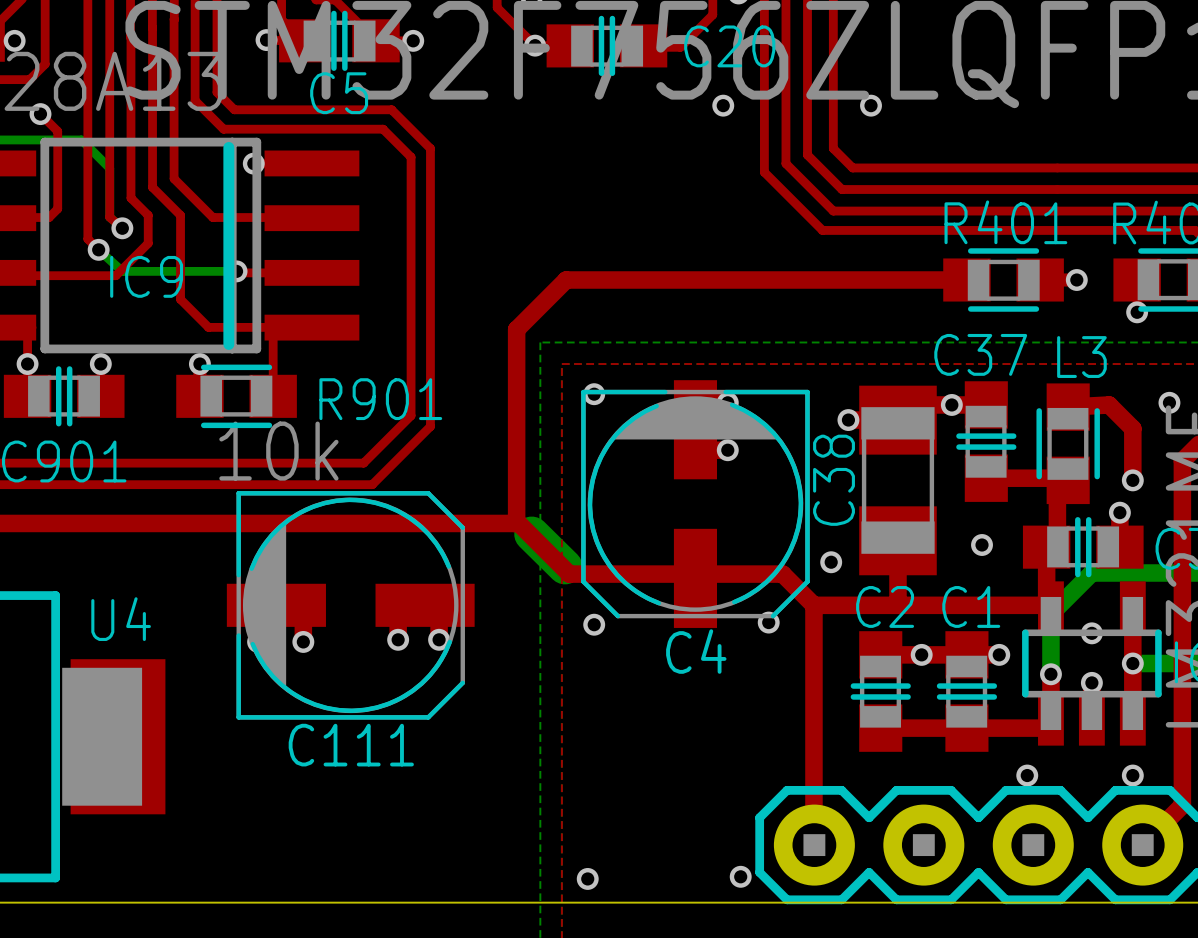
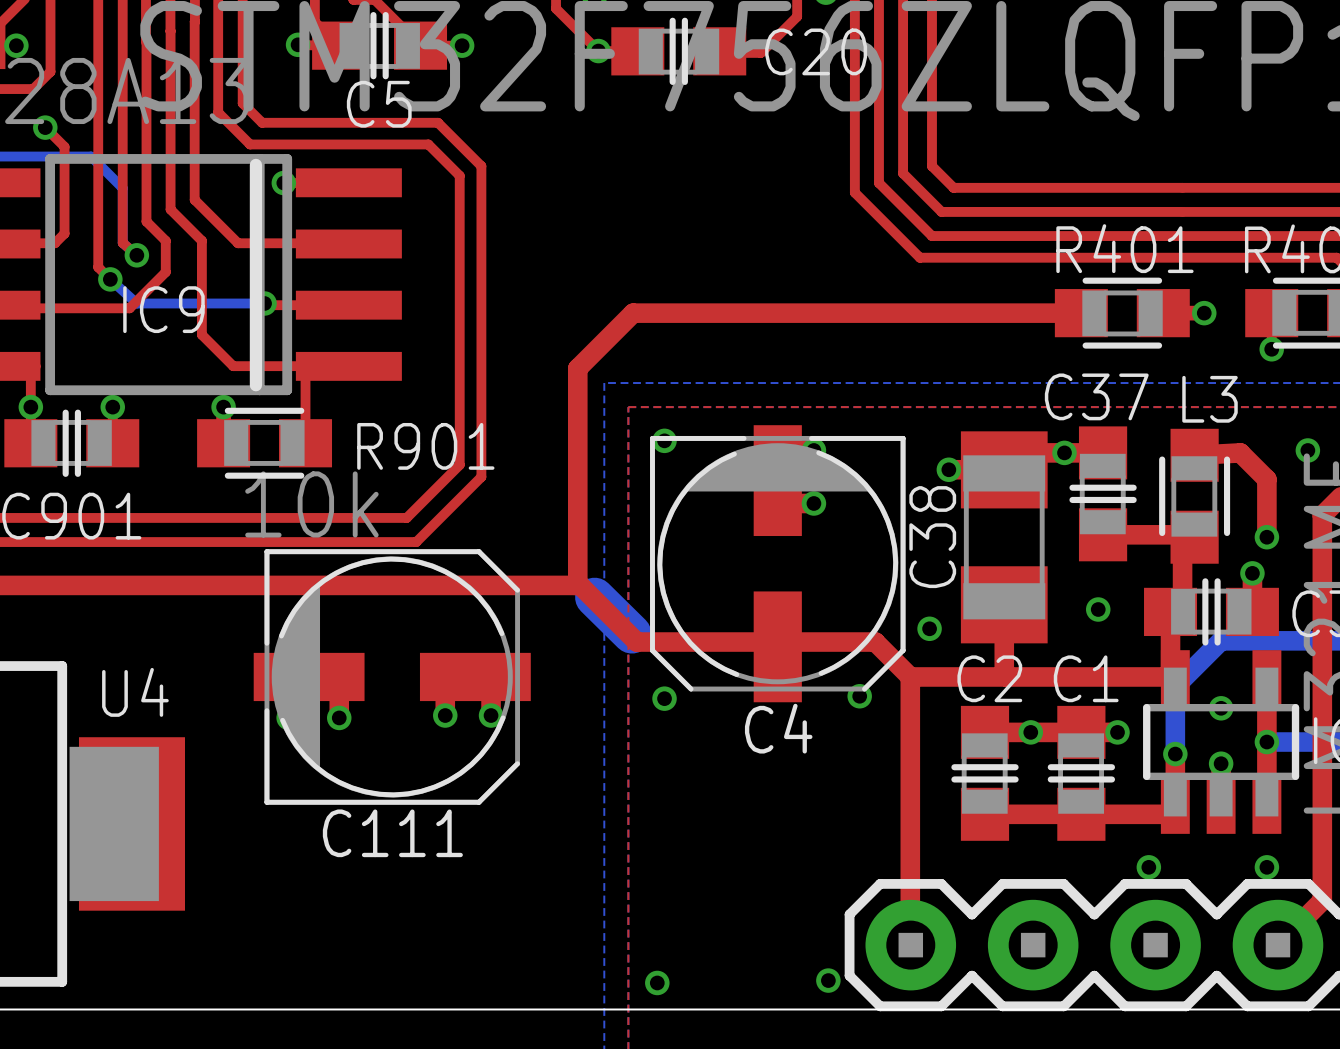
via: (723, 105) -> none
via: (871, 105) -> none

